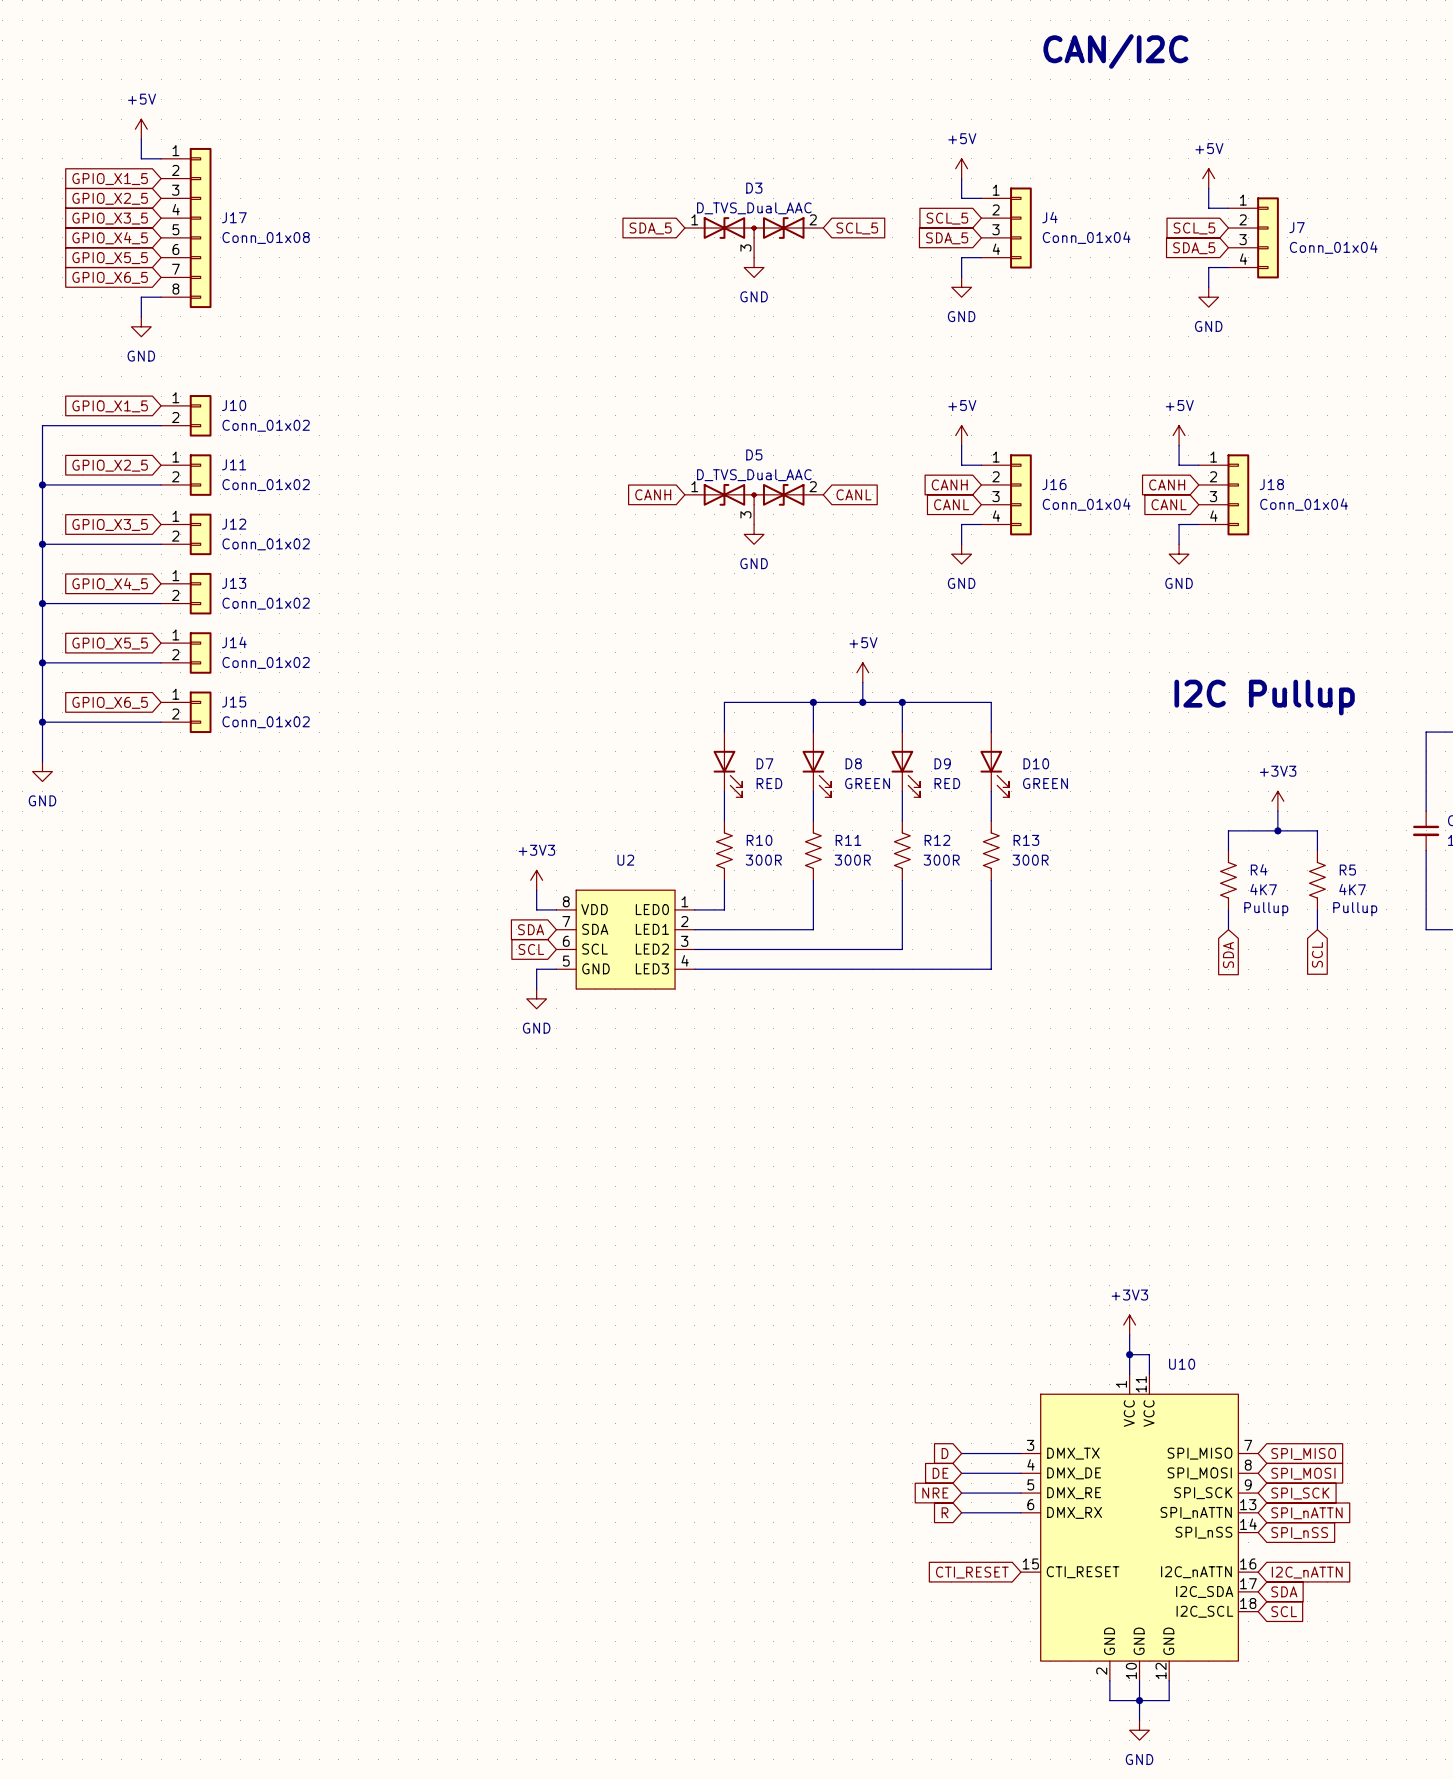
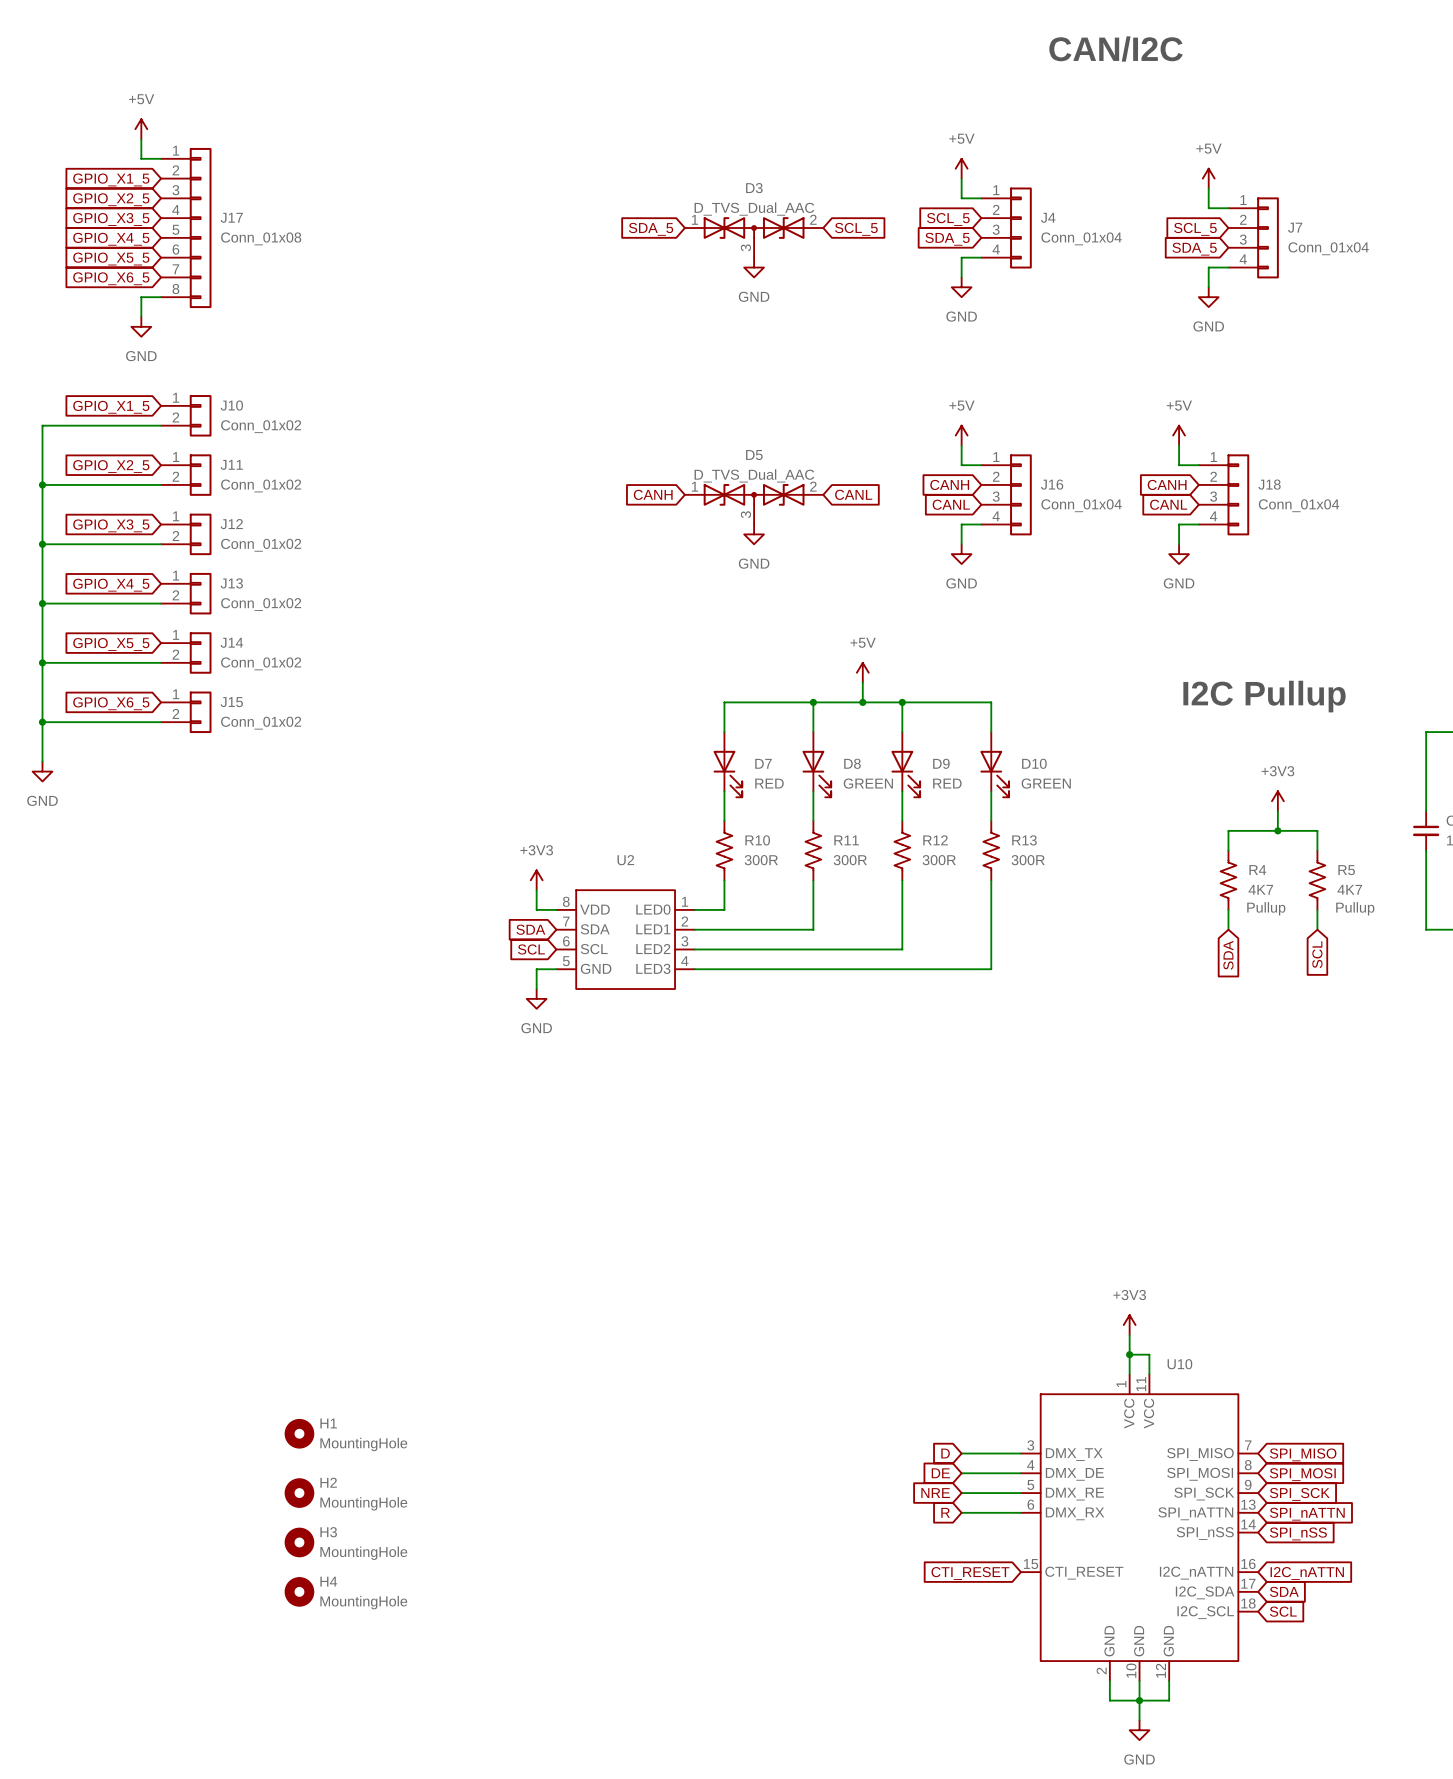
H1: none -> MountingHole (299, 1433)
H2: none -> MountingHole (299, 1493)
H3: none -> MountingHole (299, 1542)
H4: none -> MountingHole (299, 1591)

